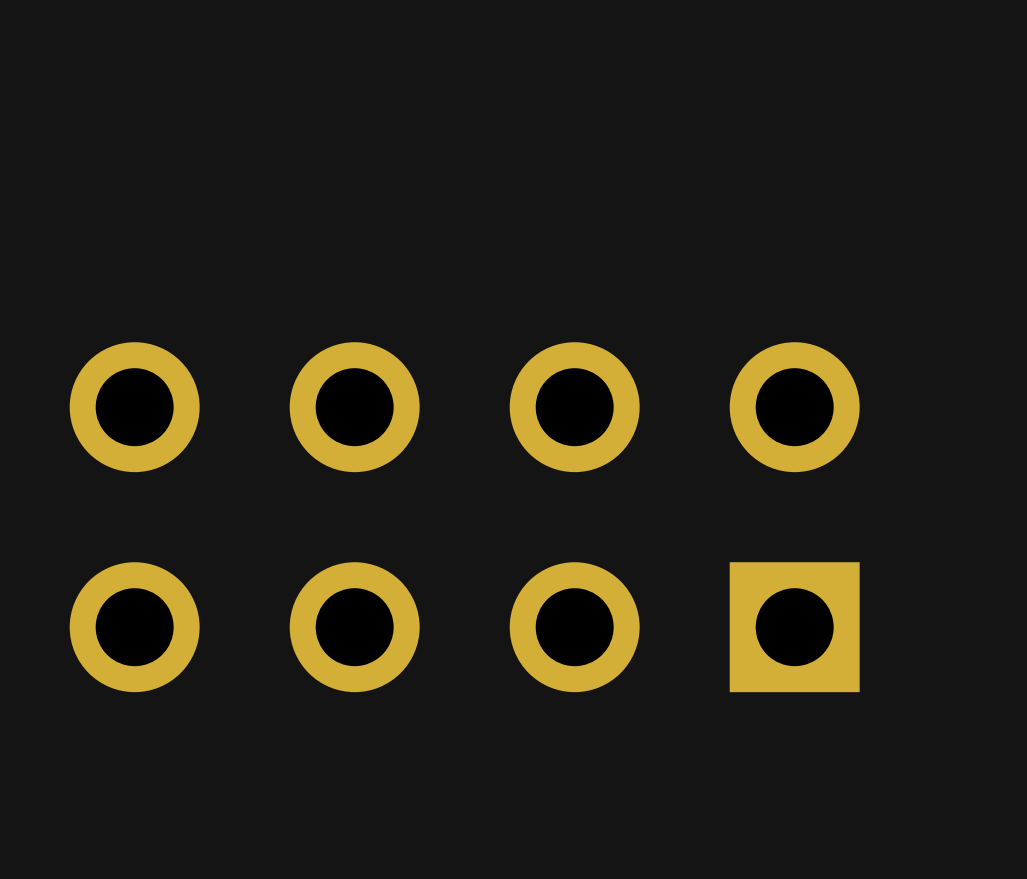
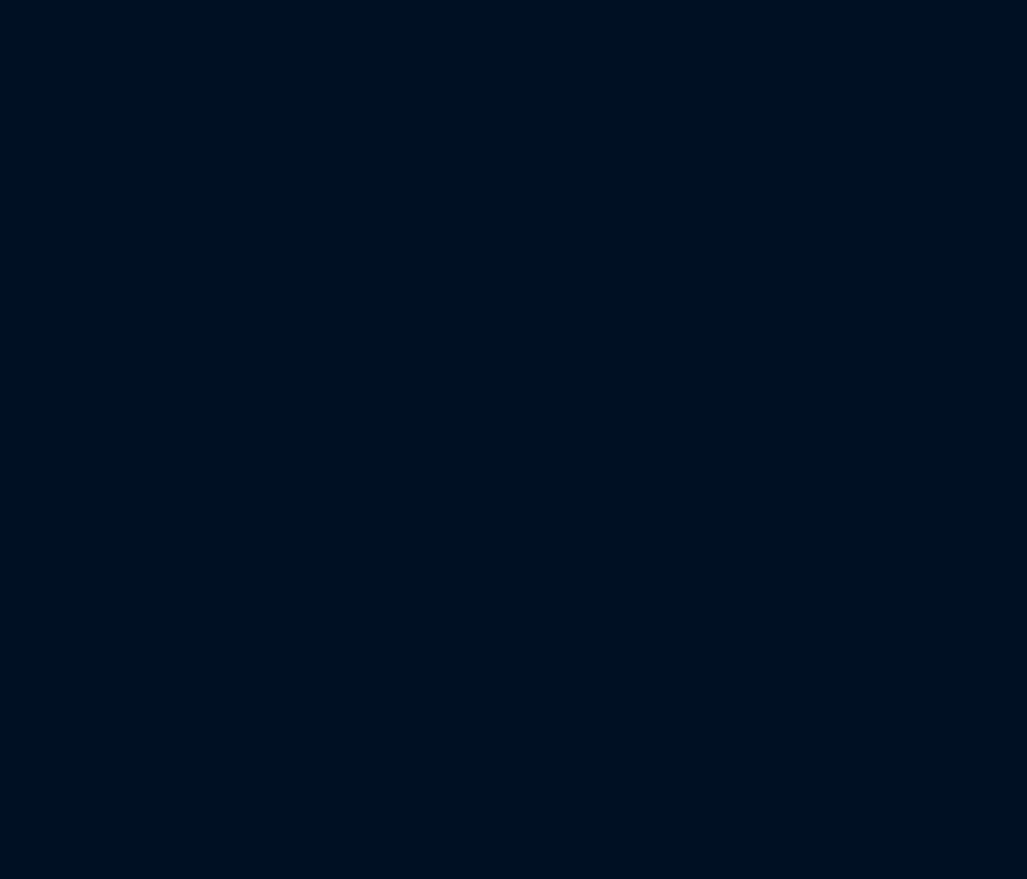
part: (464, 517) -> none

